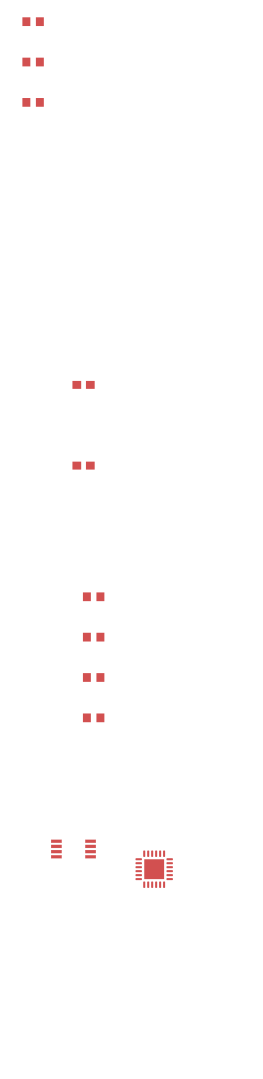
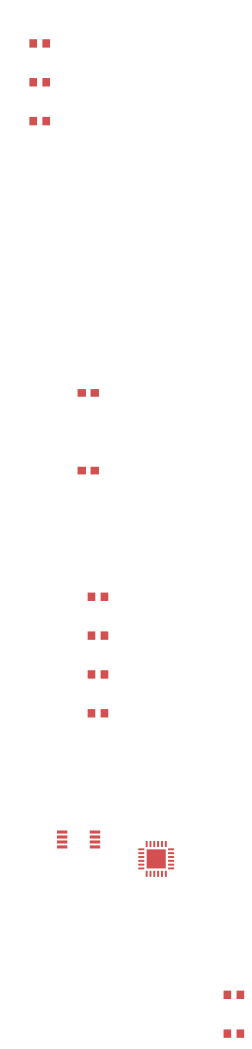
part: none -> (233, 994)
part: none -> (233, 1033)

